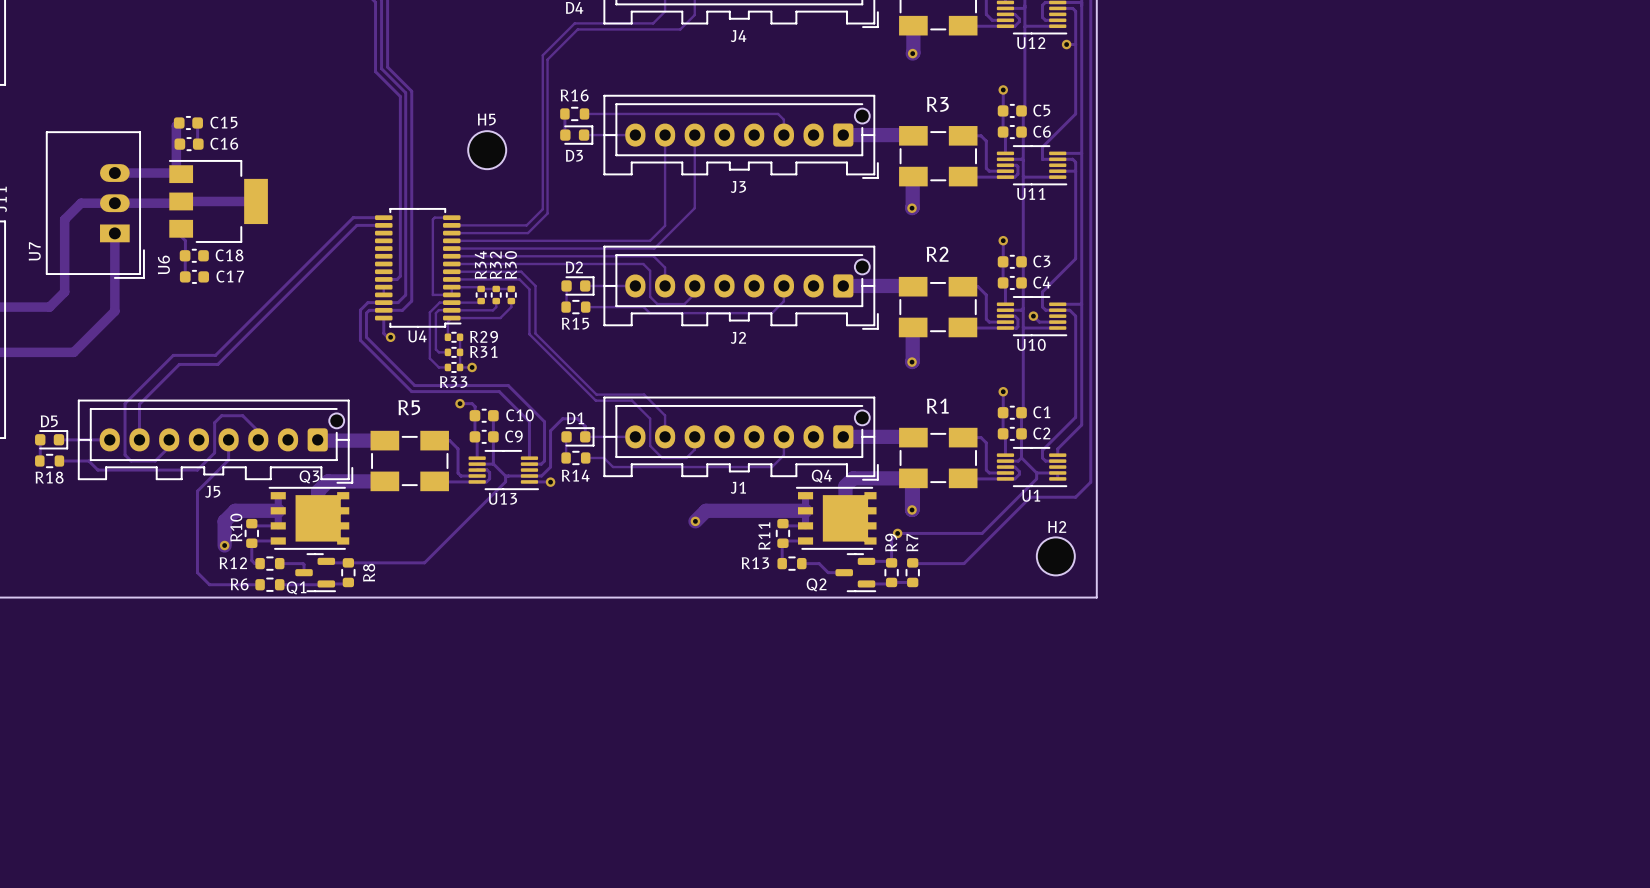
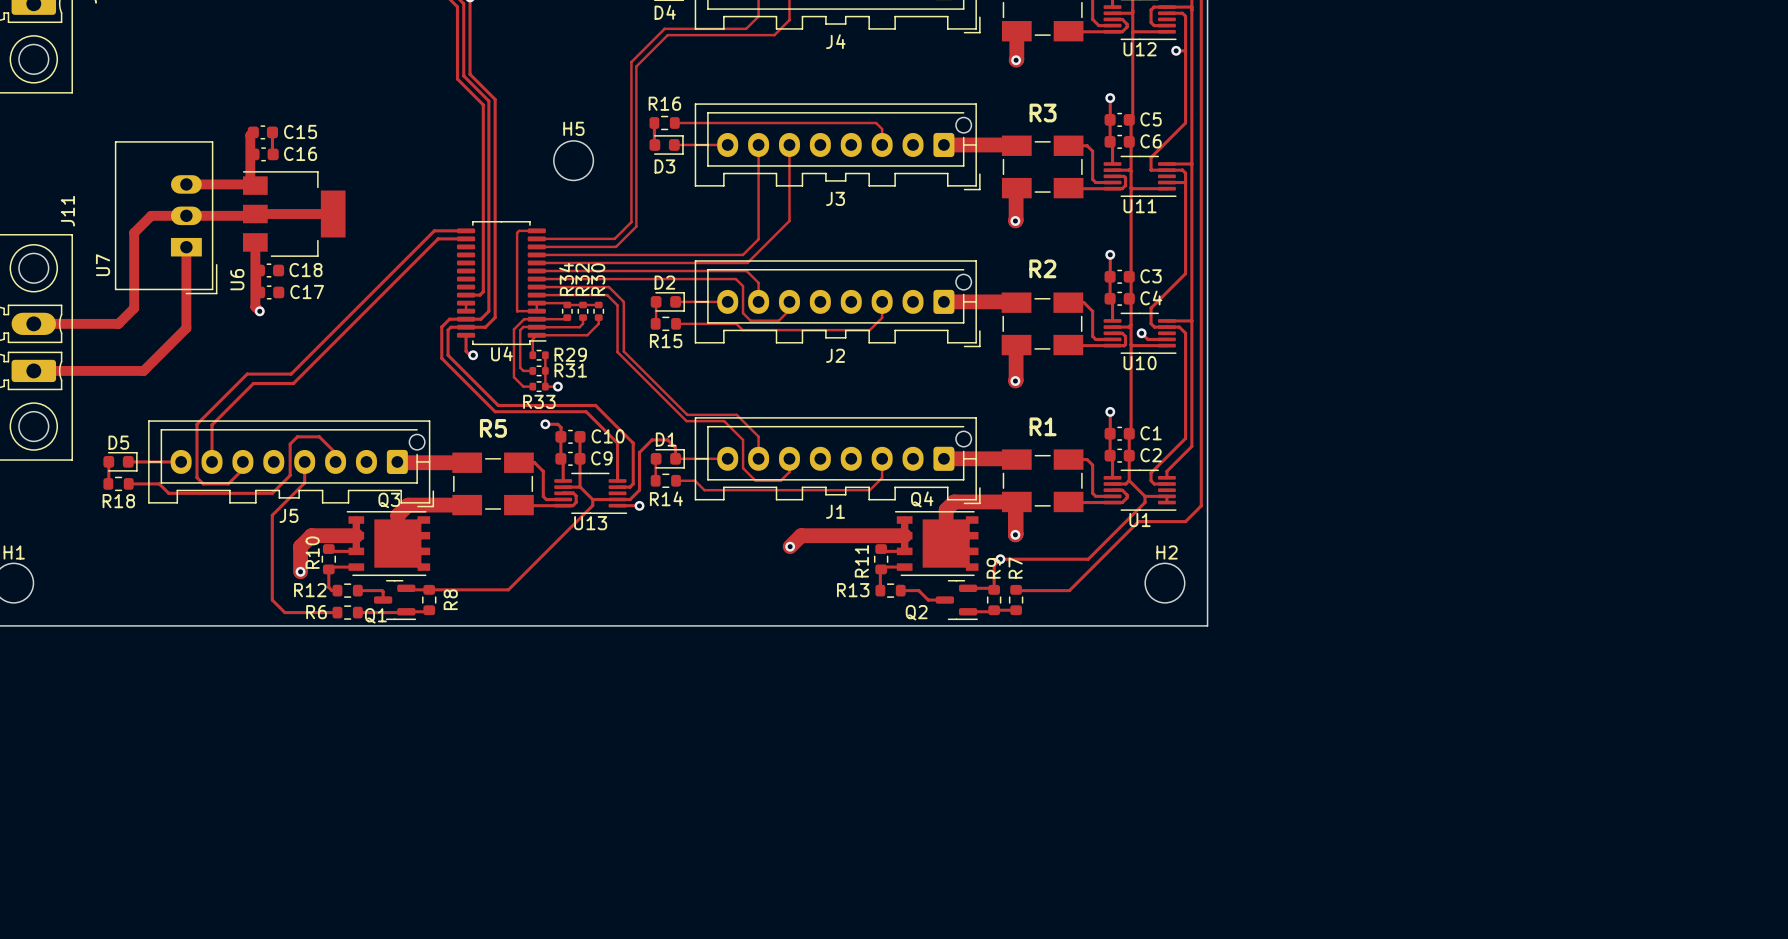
track: (181, 236) (185, 240) (185, 255) -> (255, 250) (255, 306) (259, 311)
via: none -> (259, 311)

